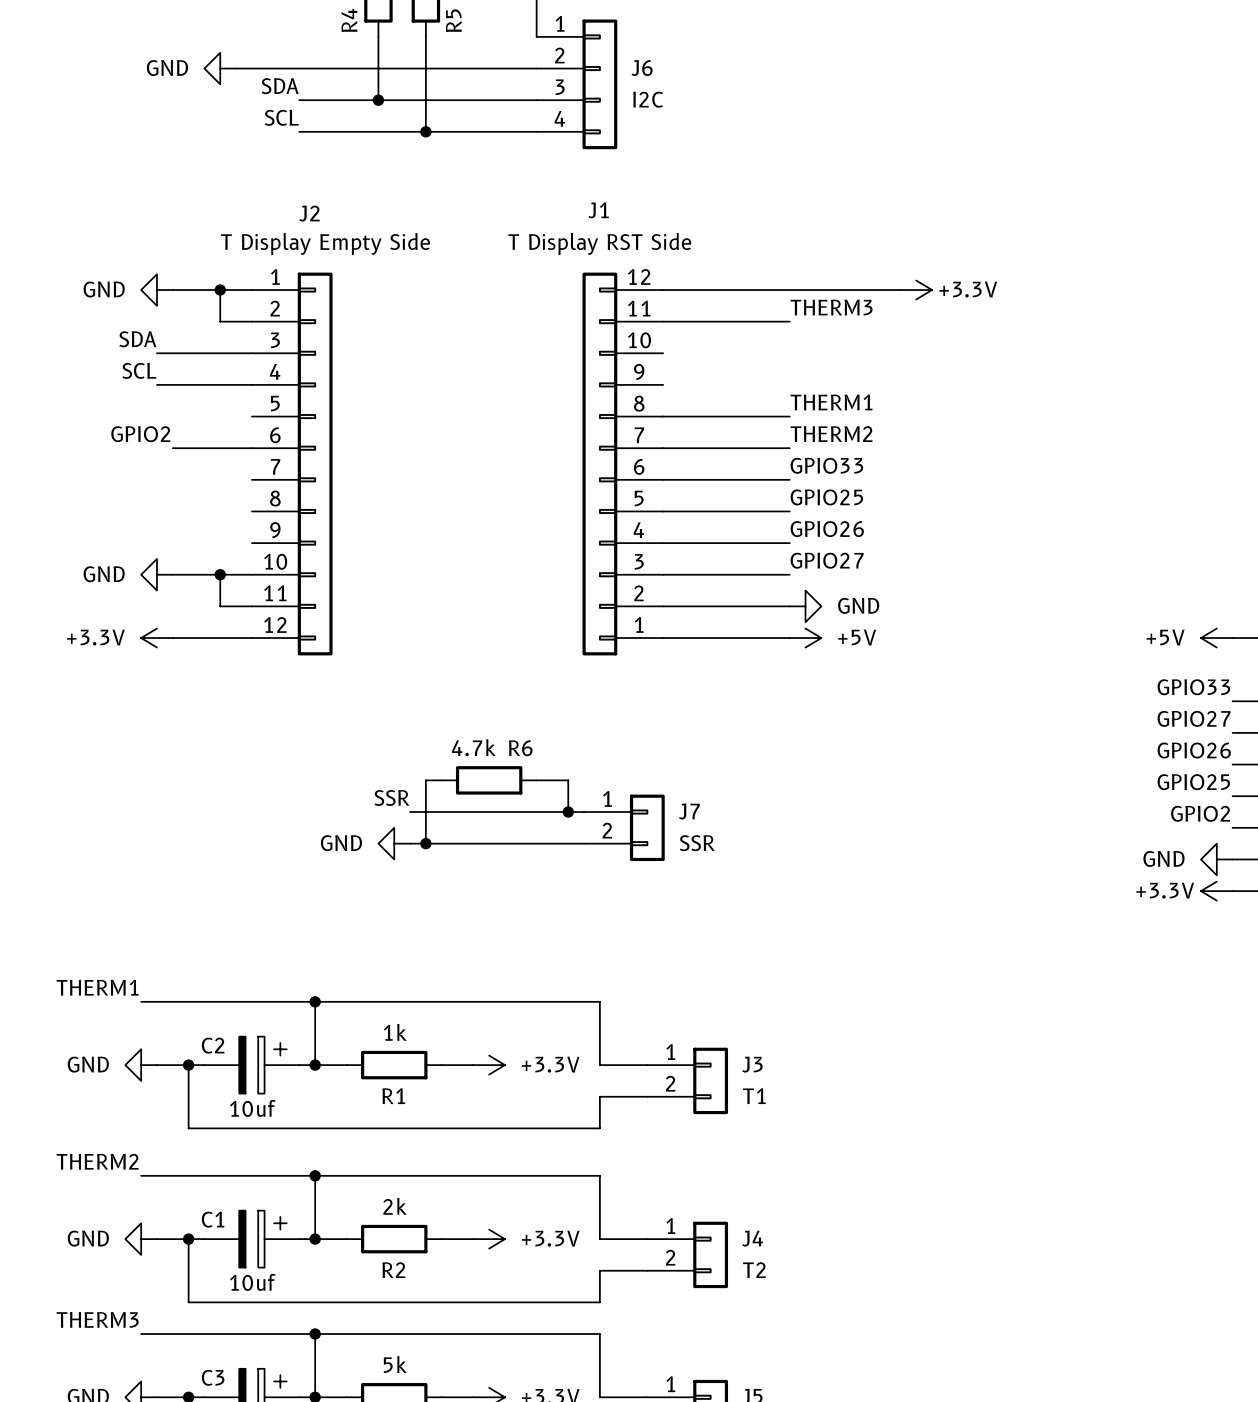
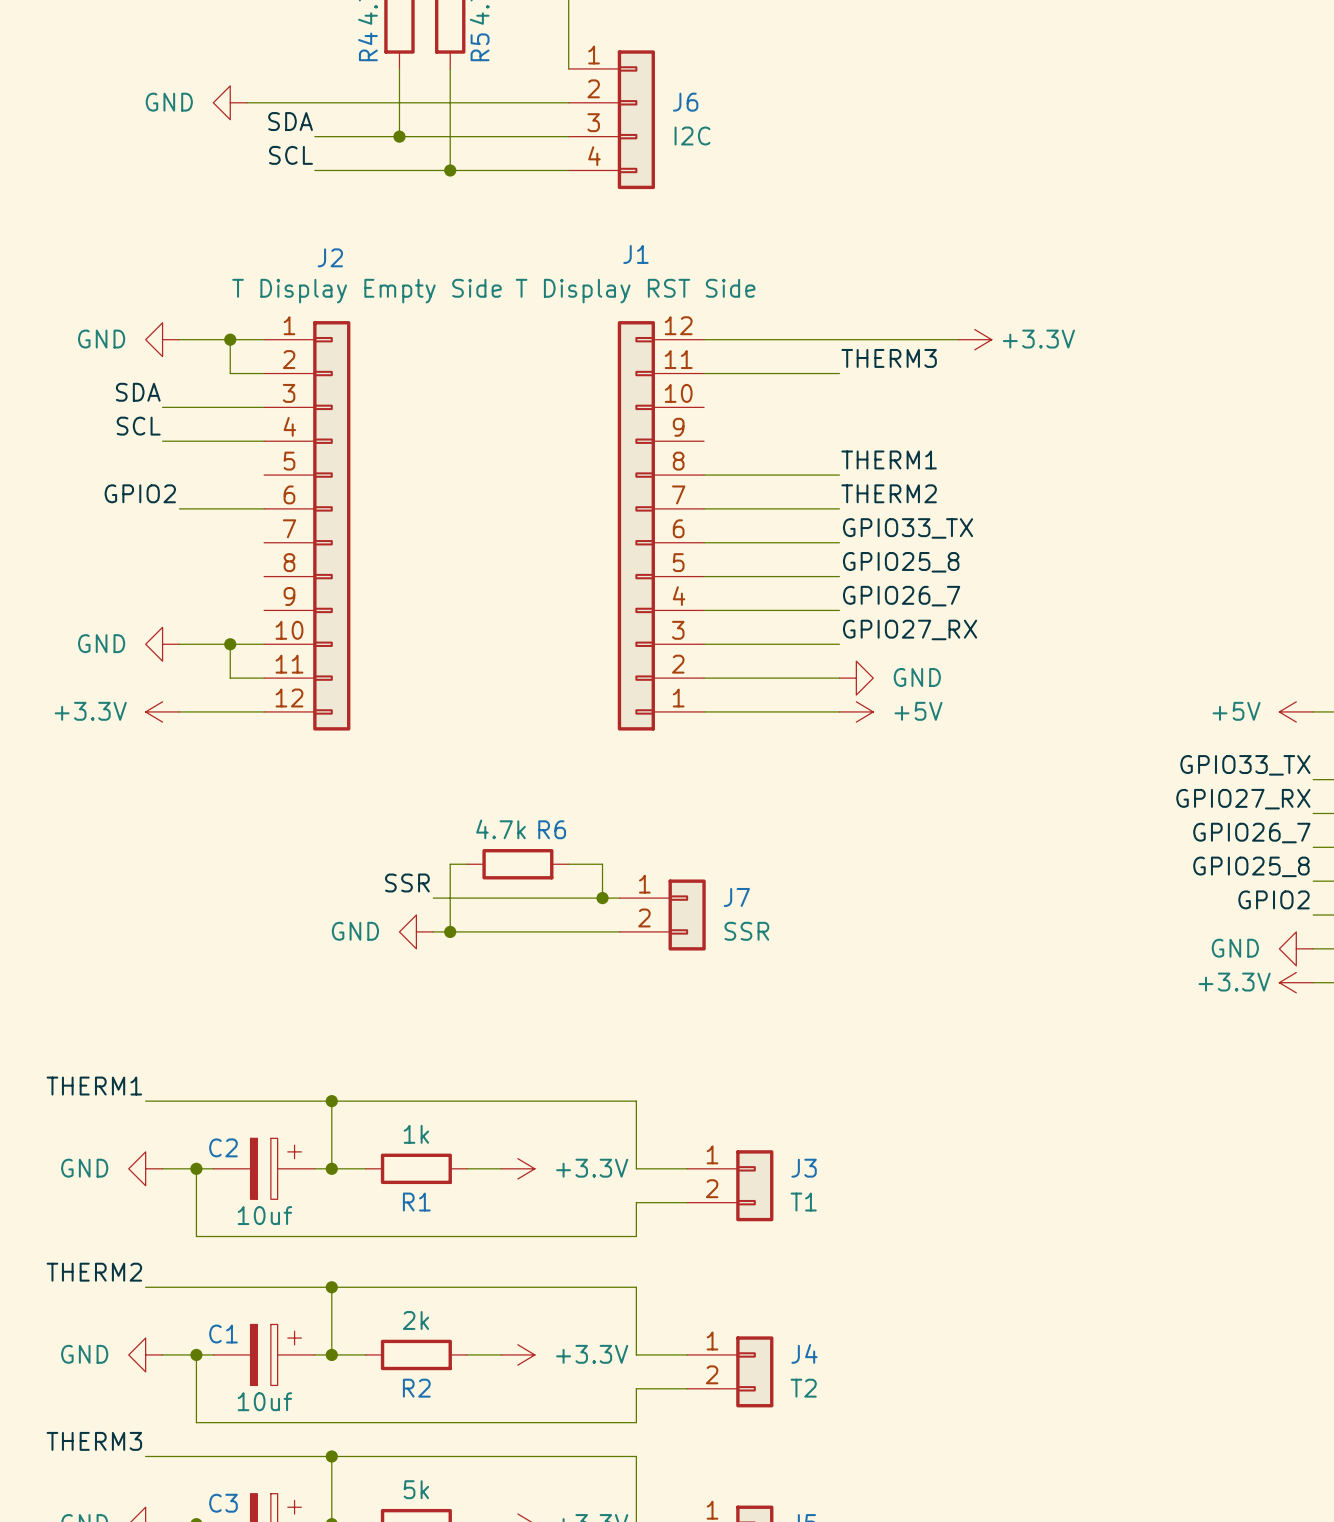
label: GPIO33 (826, 465) -> GPIO33_TX (908, 528)
label: GPIO25 (826, 497) -> GPIO25_8 (901, 562)
label: GPIO26 (827, 529) -> GPIO26_7 (901, 596)
label: GPIO27 (827, 560) -> GPIO27_RX (910, 629)
label: GPIO33 (1193, 687) -> GPIO33_TX (1245, 765)
label: GPIO27 (1194, 718) -> GPIO27_RX (1243, 799)
label: GPIO26 (1194, 750) -> GPIO26_7 (1251, 833)
label: GPIO25 (1193, 782) -> GPIO25_8 (1251, 866)

